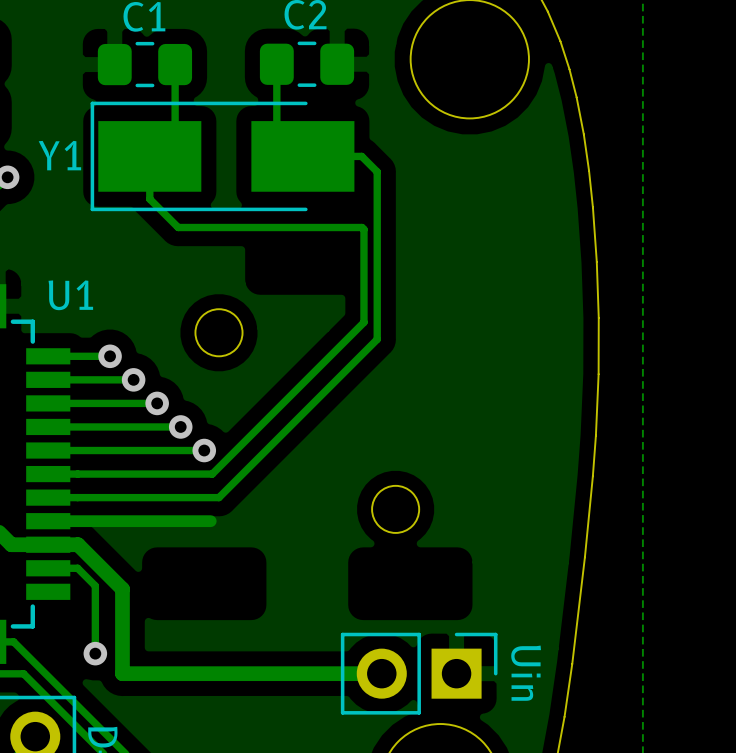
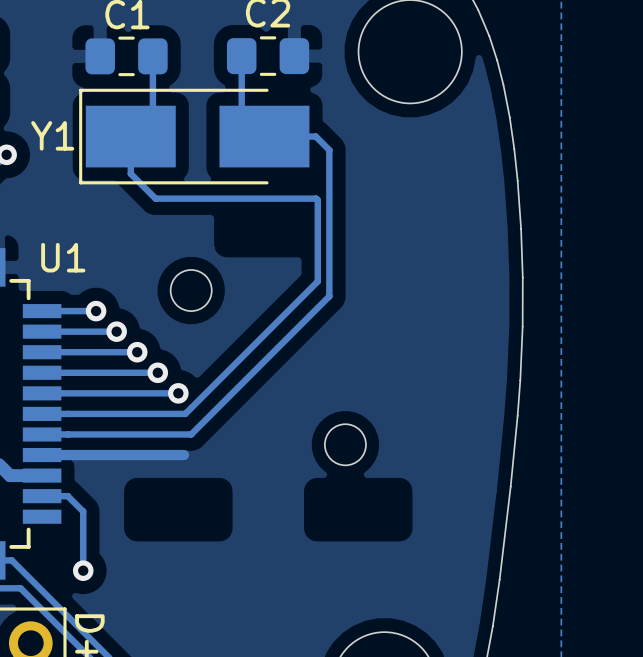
track: (48, 544) (78, 544) (122, 589) (122, 673) (381, 673) -> none
Uin: (419, 673) -> none

